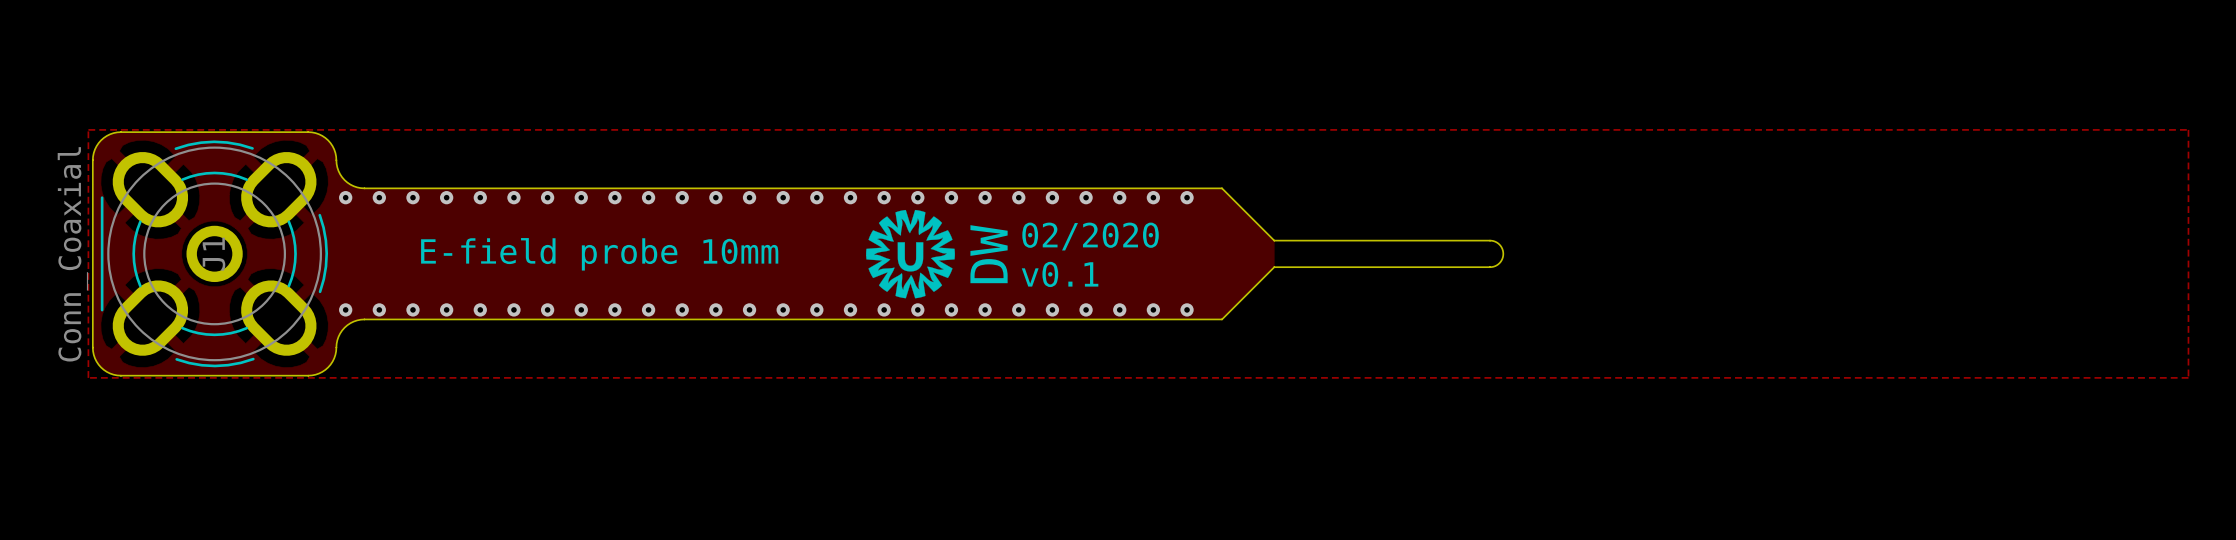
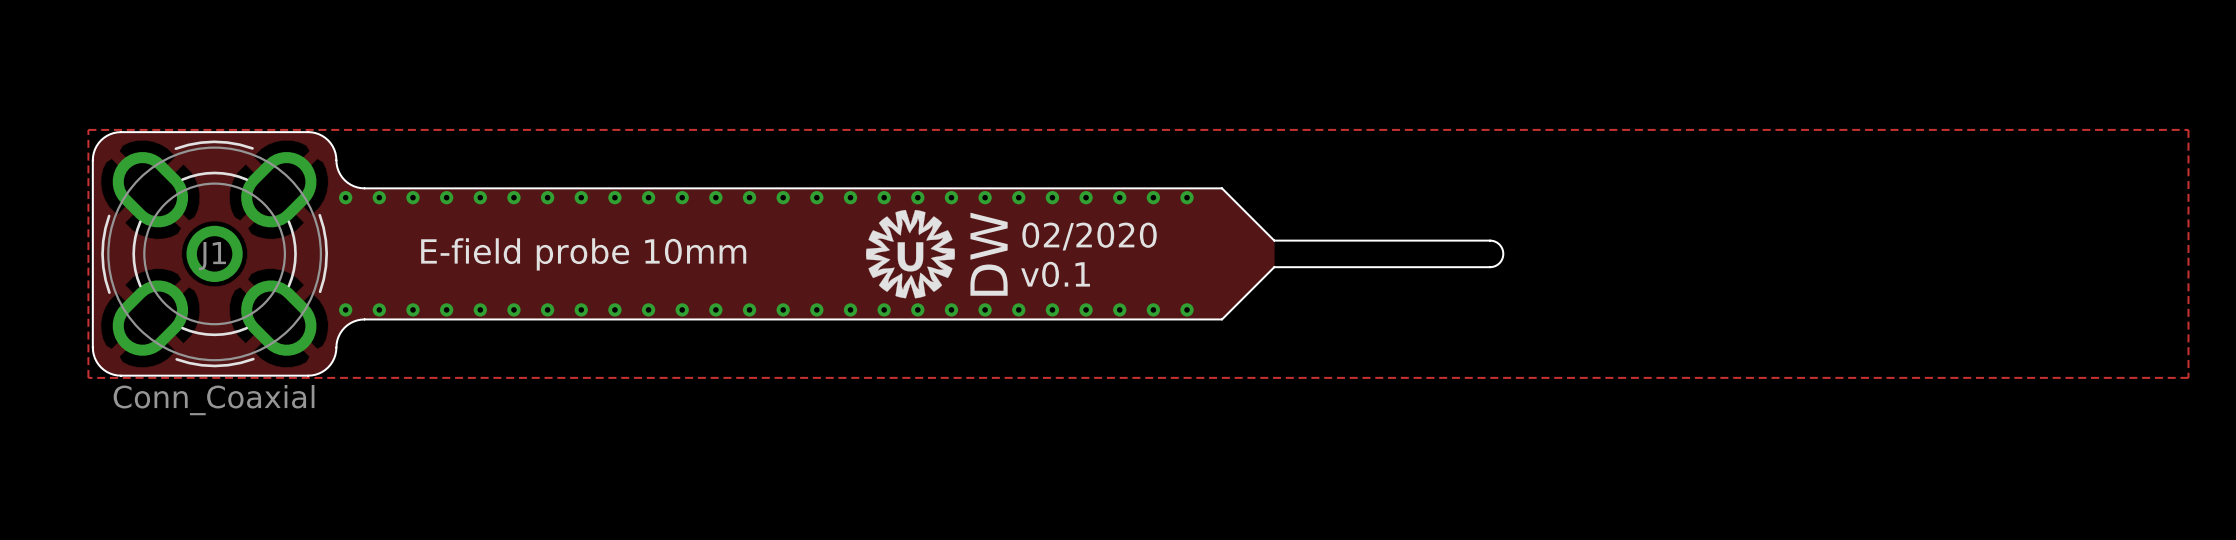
J1 footprint: [100, 140, 329, 368] -> [101, 140, 329, 368]
J1 value rotation: 0° (72, 254) -> 90° clockwise (214, 400)
J1 name rotation: 0° (213, 254) -> 90° clockwise (212, 256)

